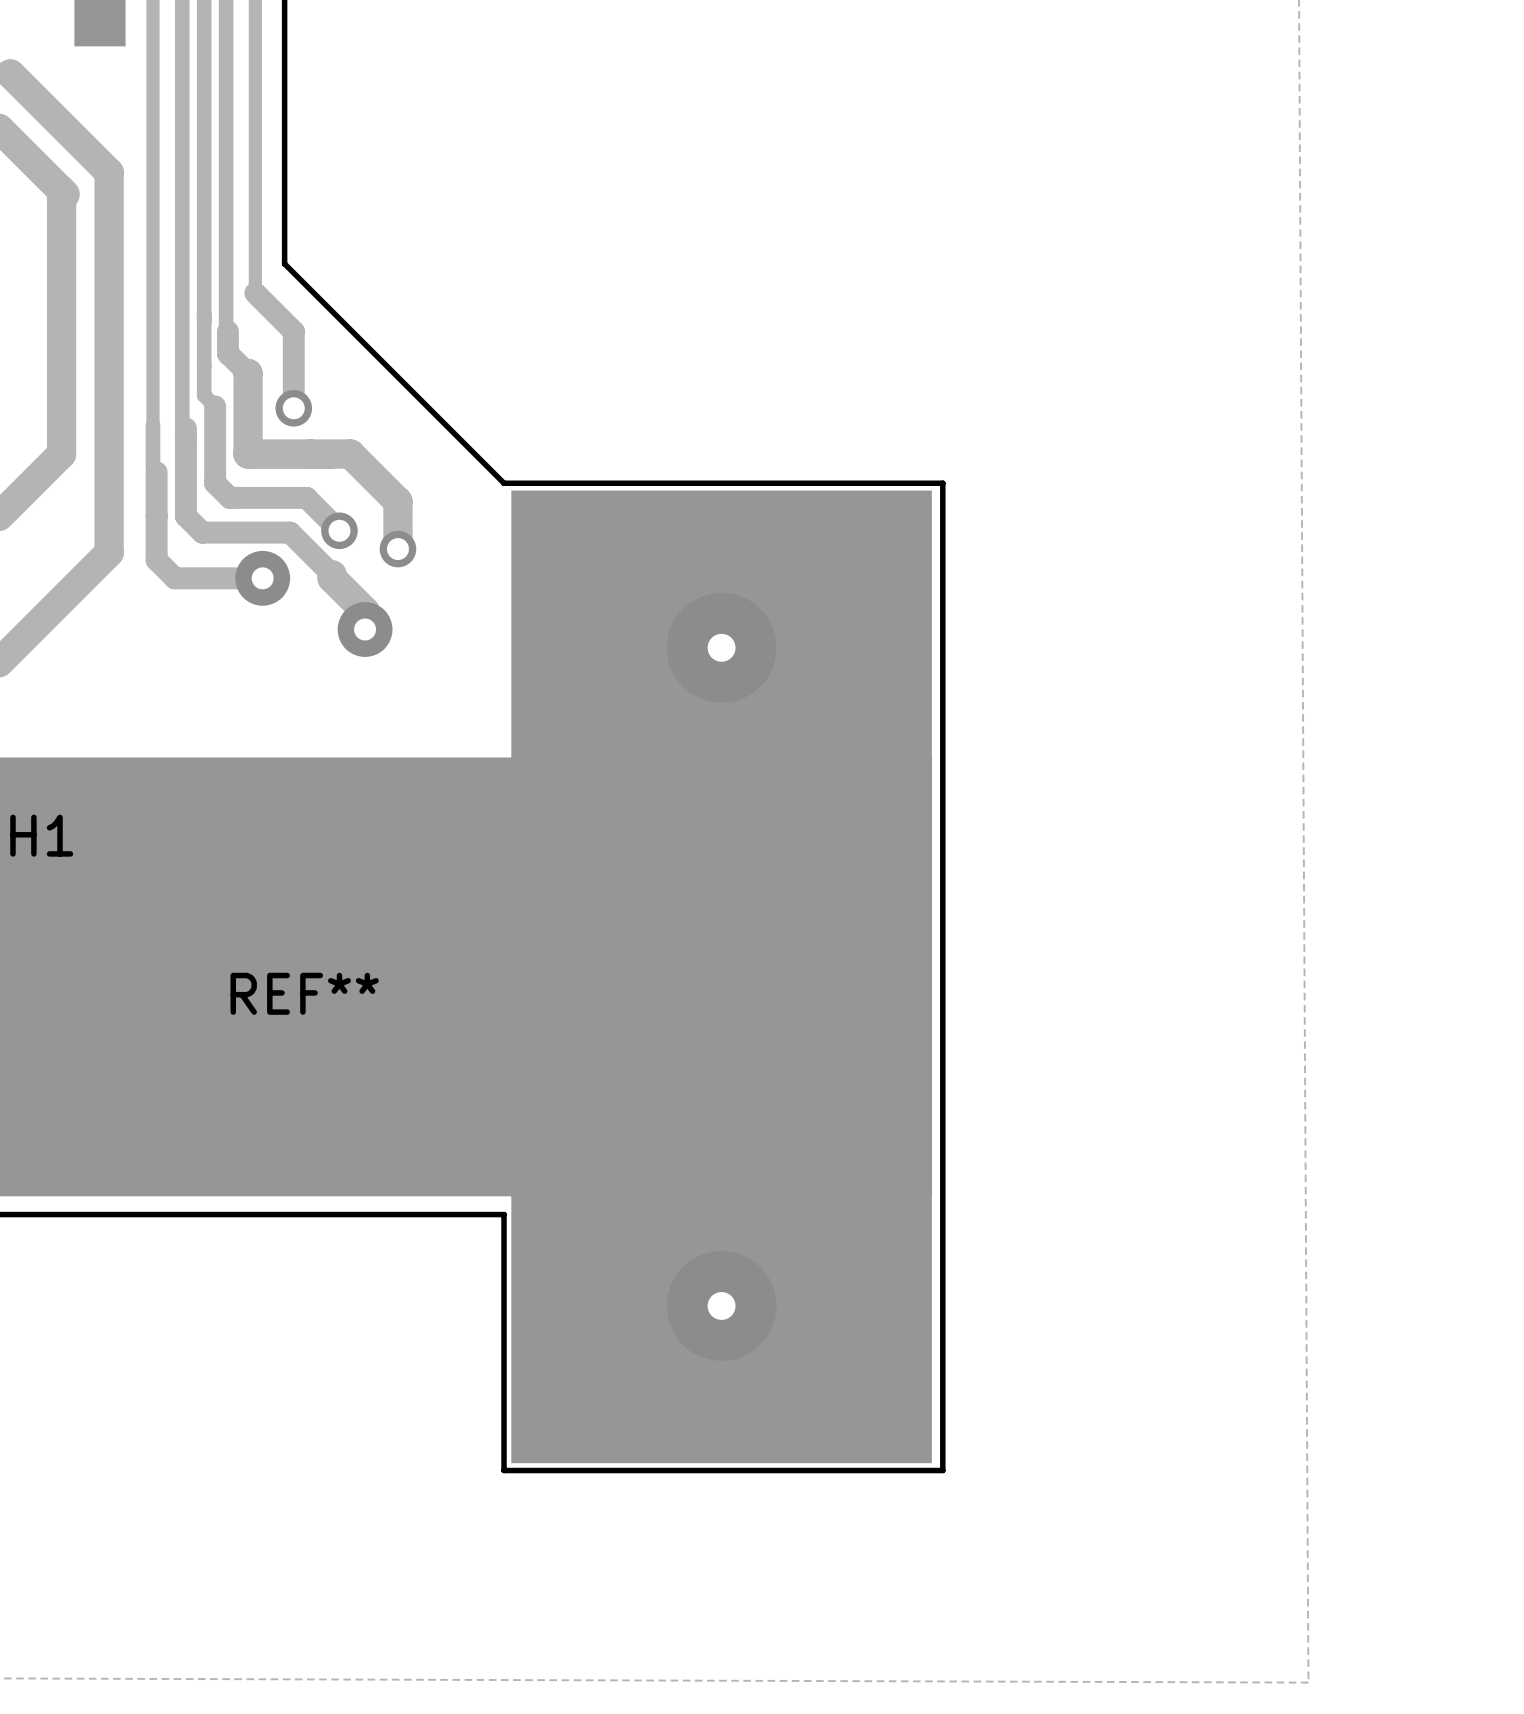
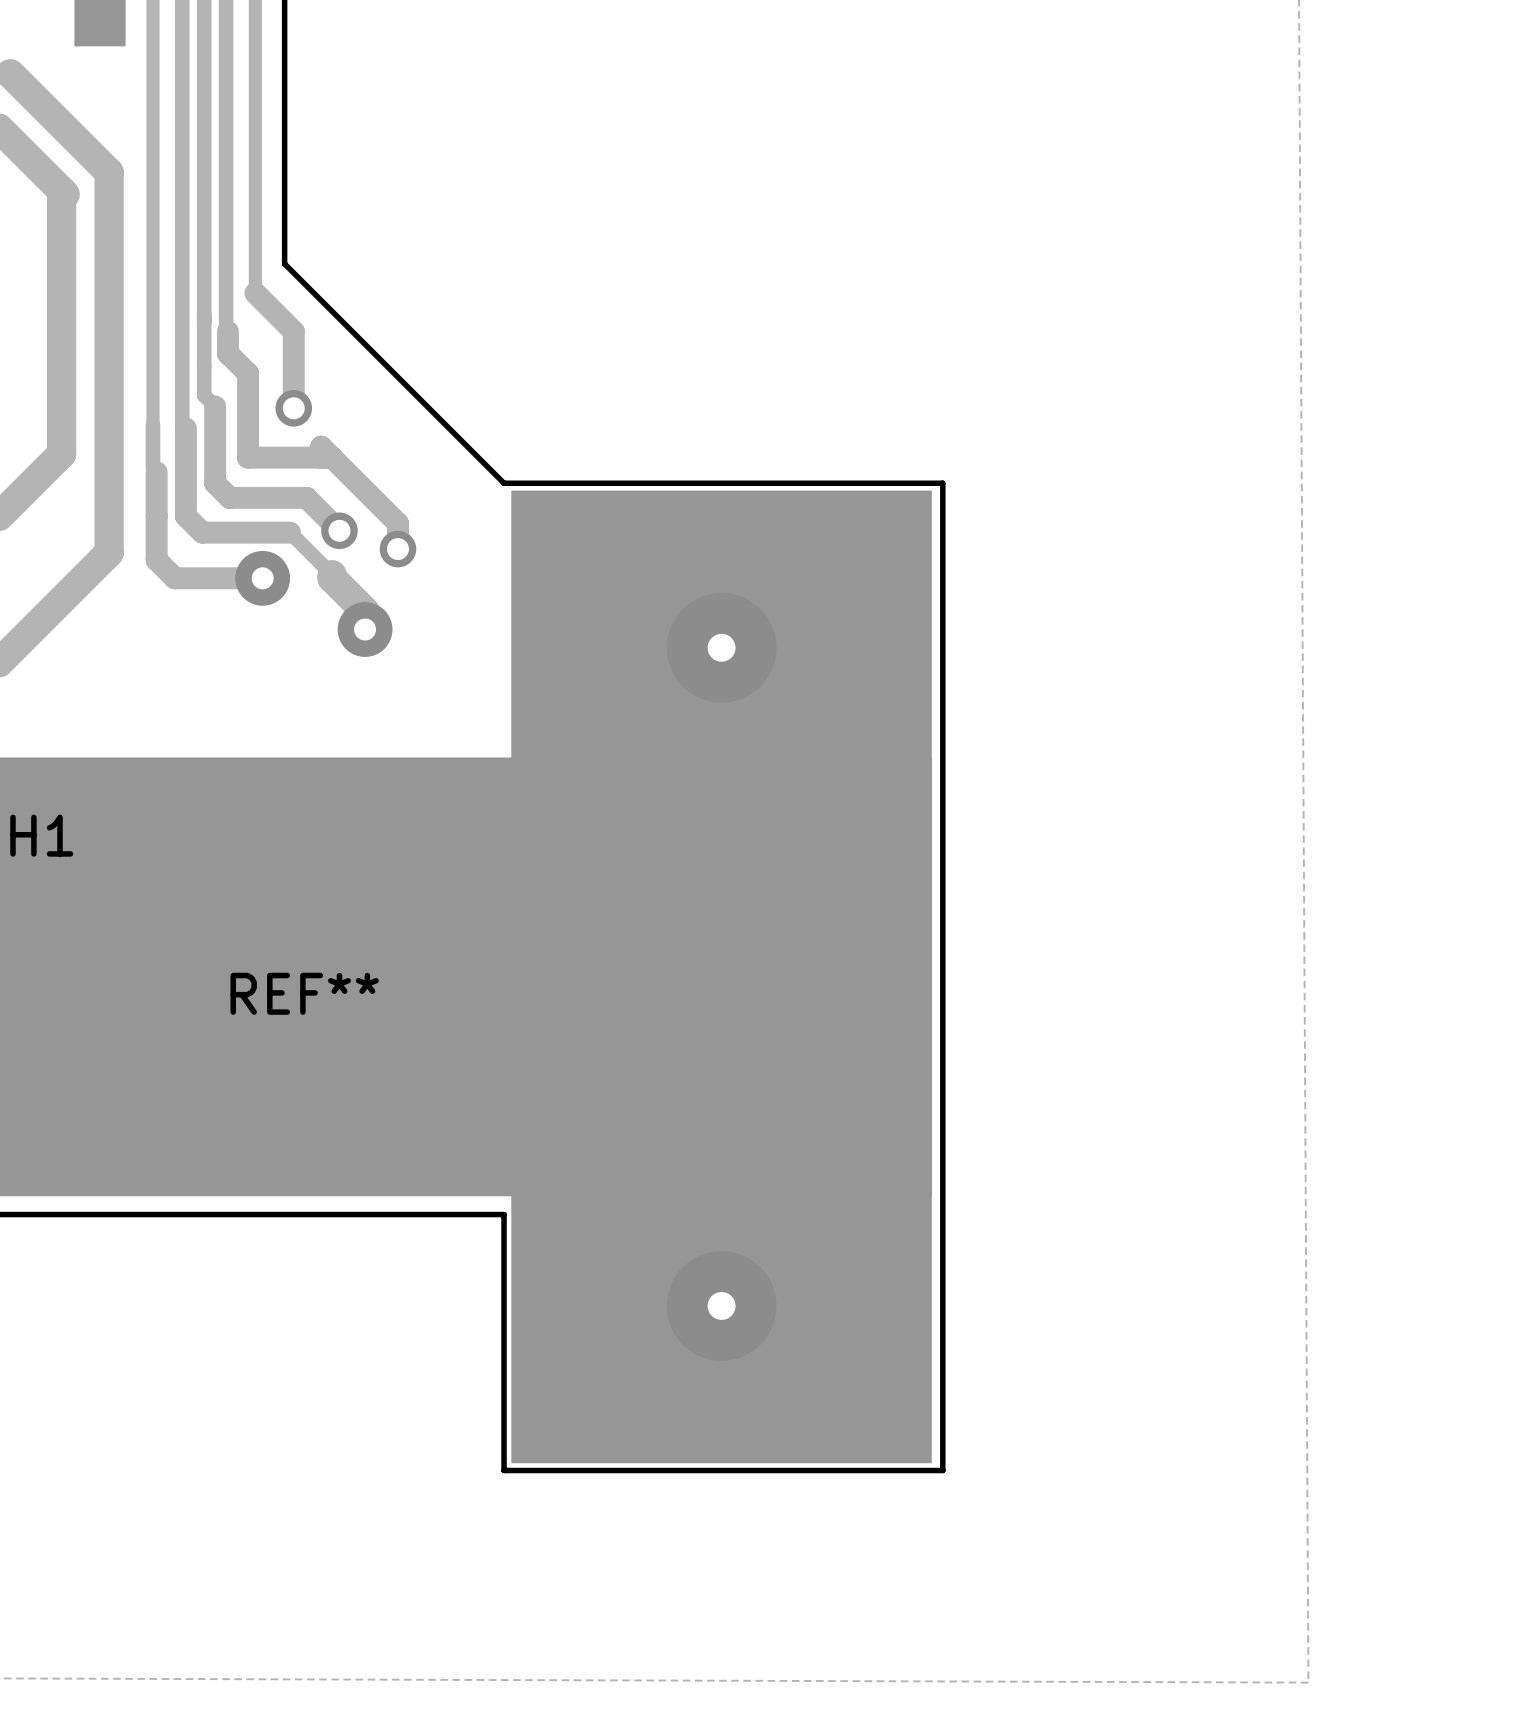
track: (248, 373) (248, 454) (350, 454) (397, 501) (397, 549) -> none
track: none -> (321, 457) (321, 446) (397, 523)
track width: thick (290, 532) (332, 574) -> thin (290, 532) (332, 574)

